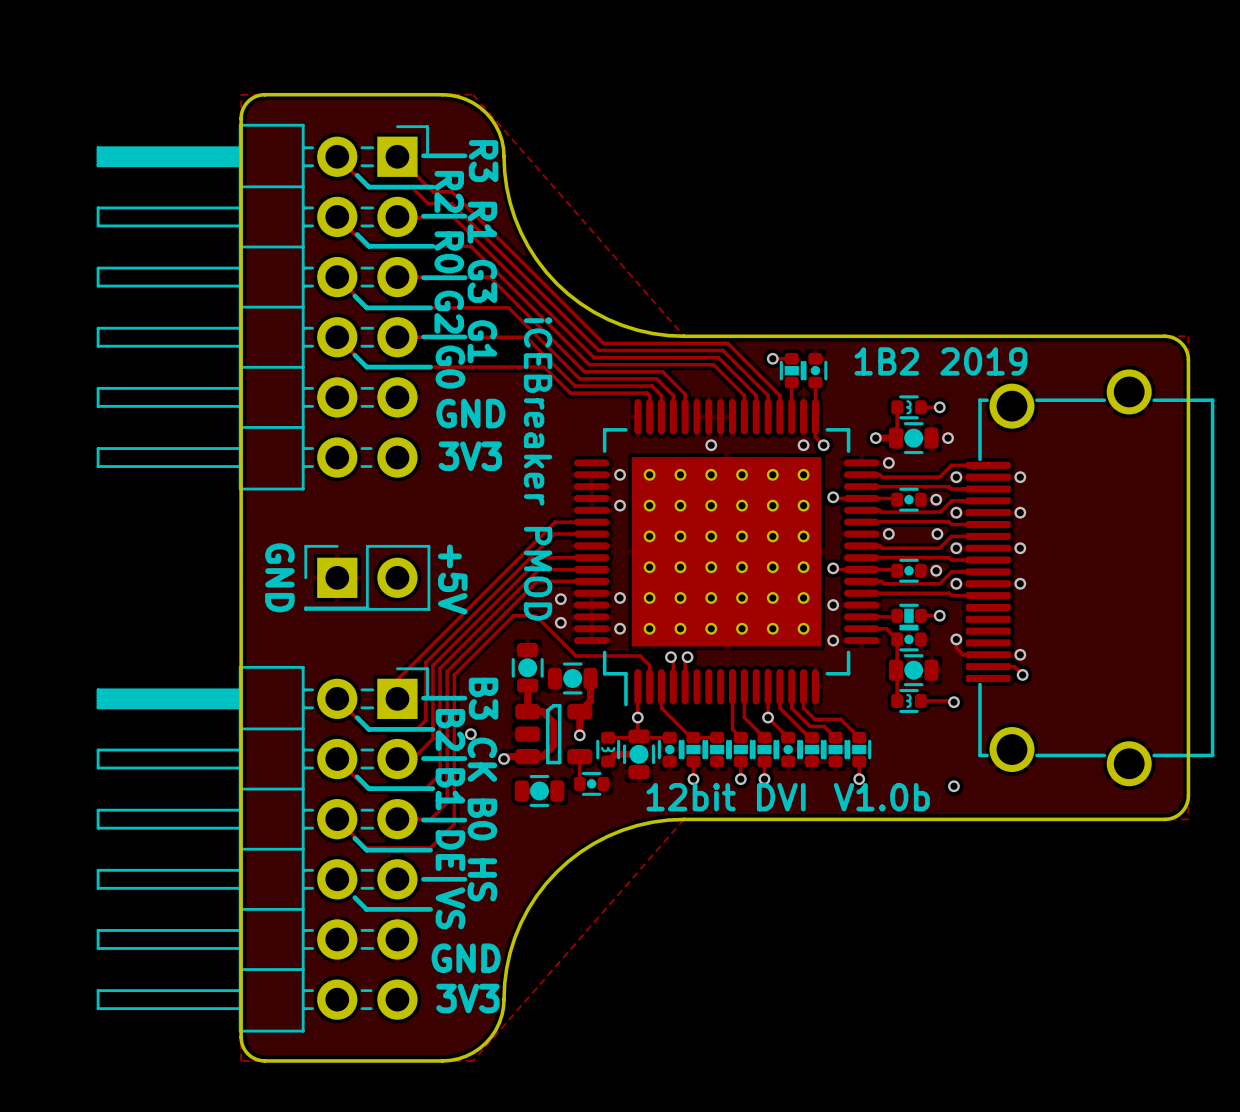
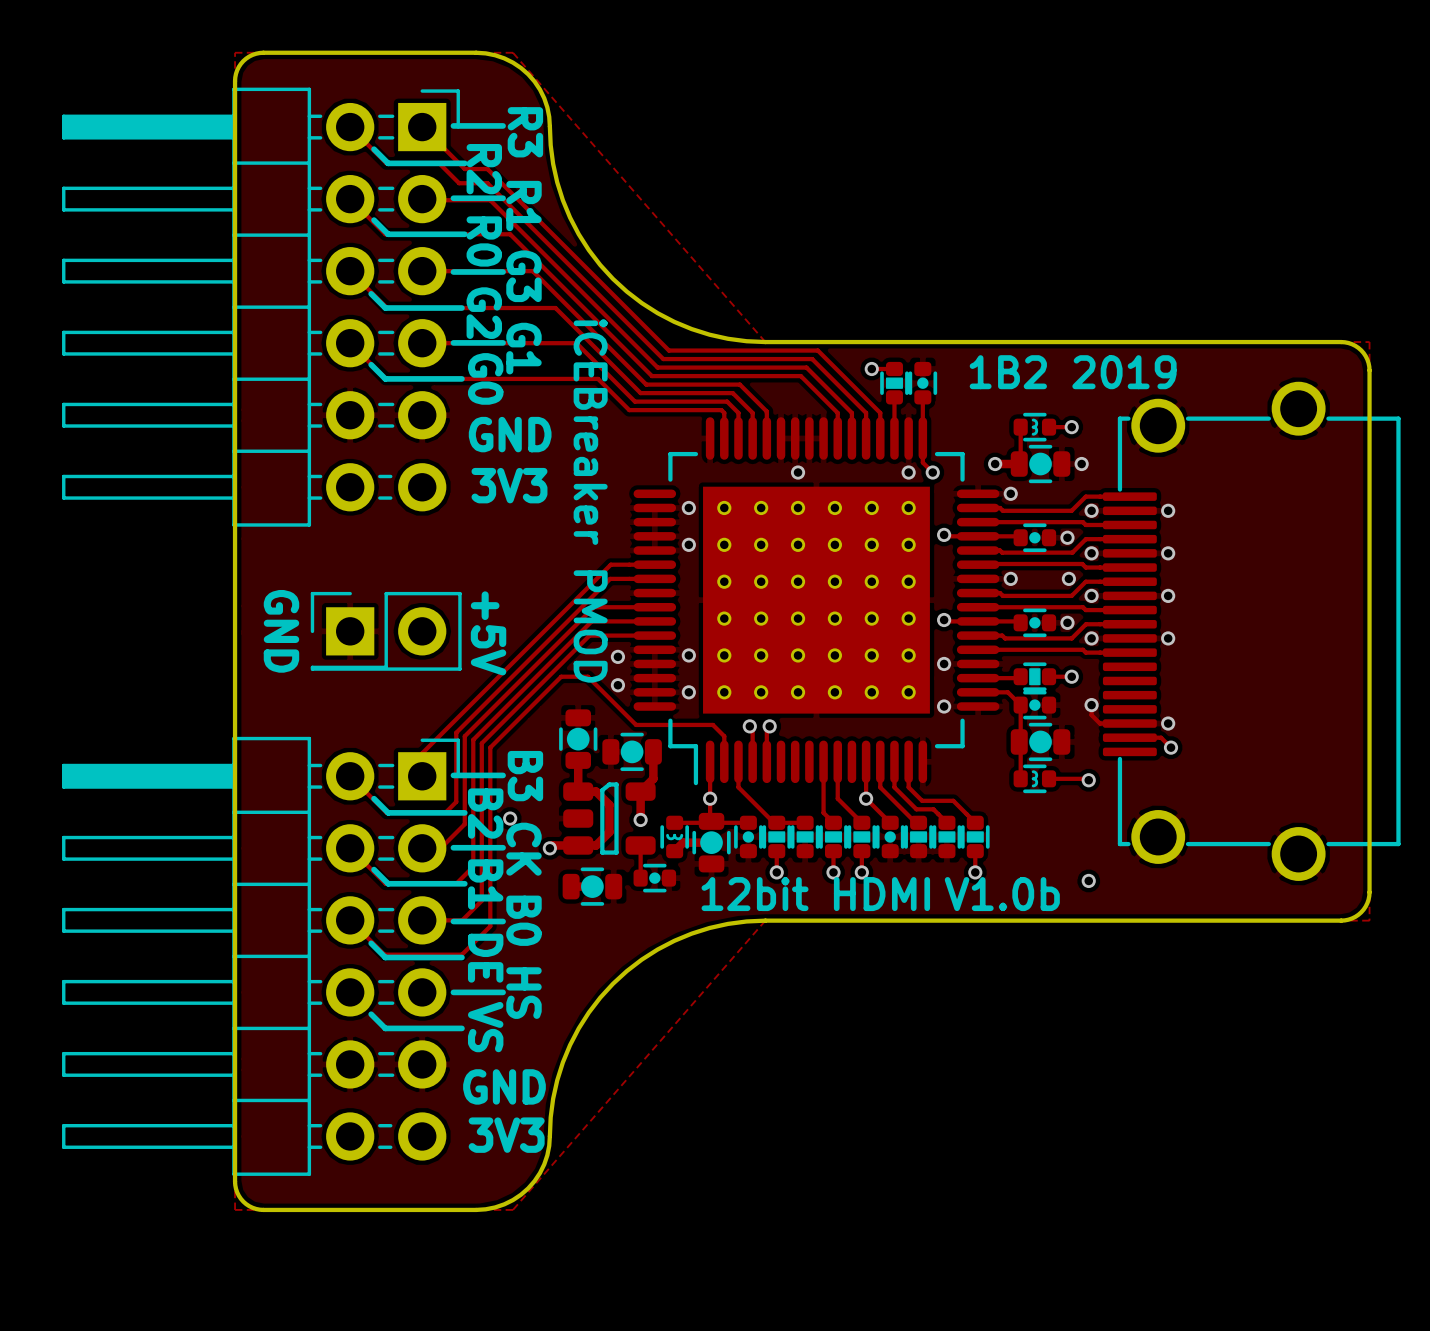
text: 12bit DVI (726, 797) -> 12bit HDMI (815, 894)

